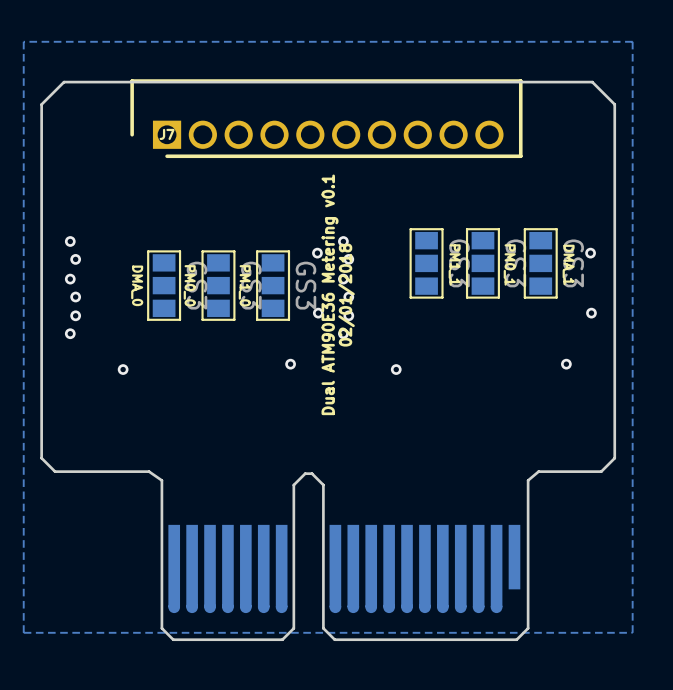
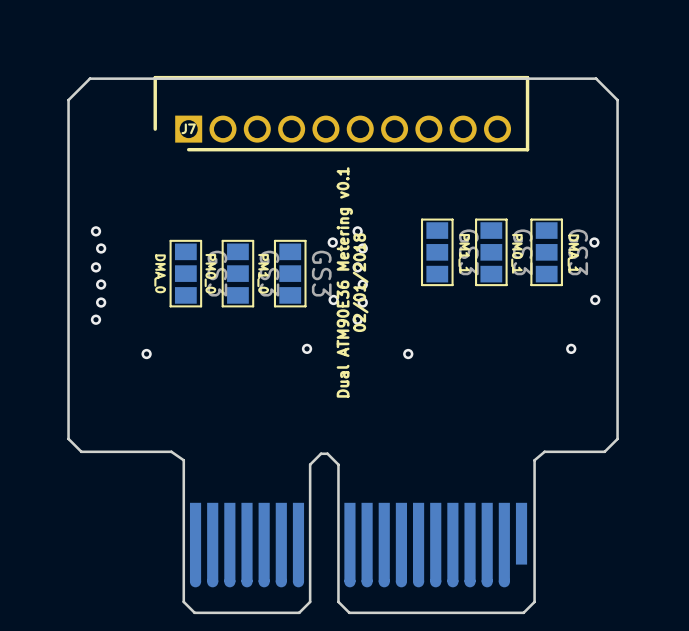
zone outline: (632, 41) (632, 632) (23, 632) (23, 41) (632, 41) -> none

